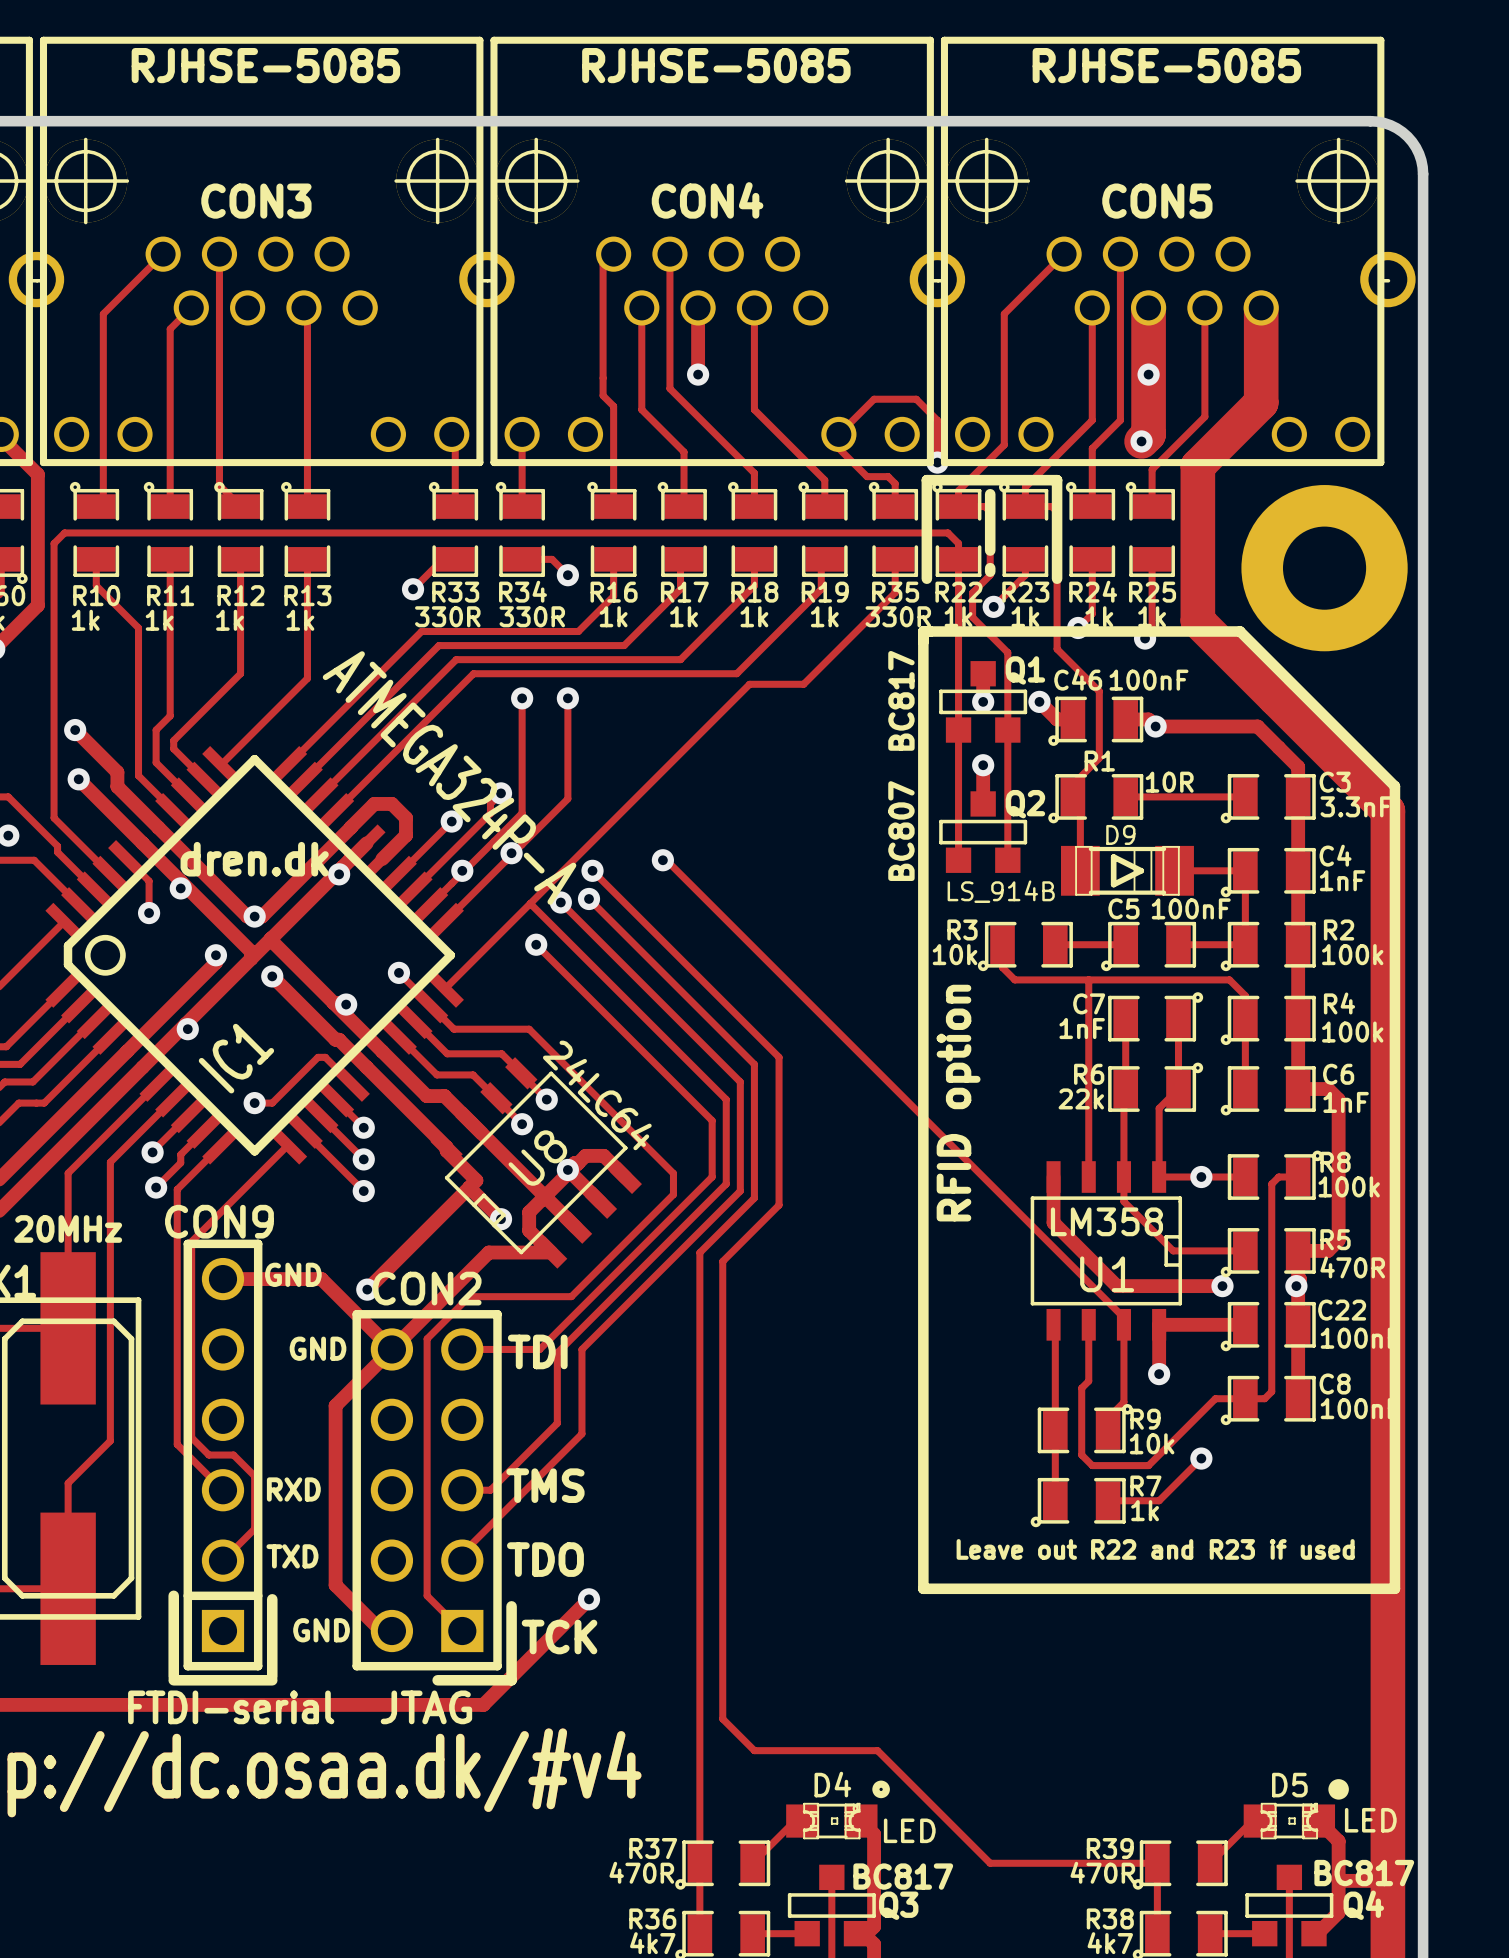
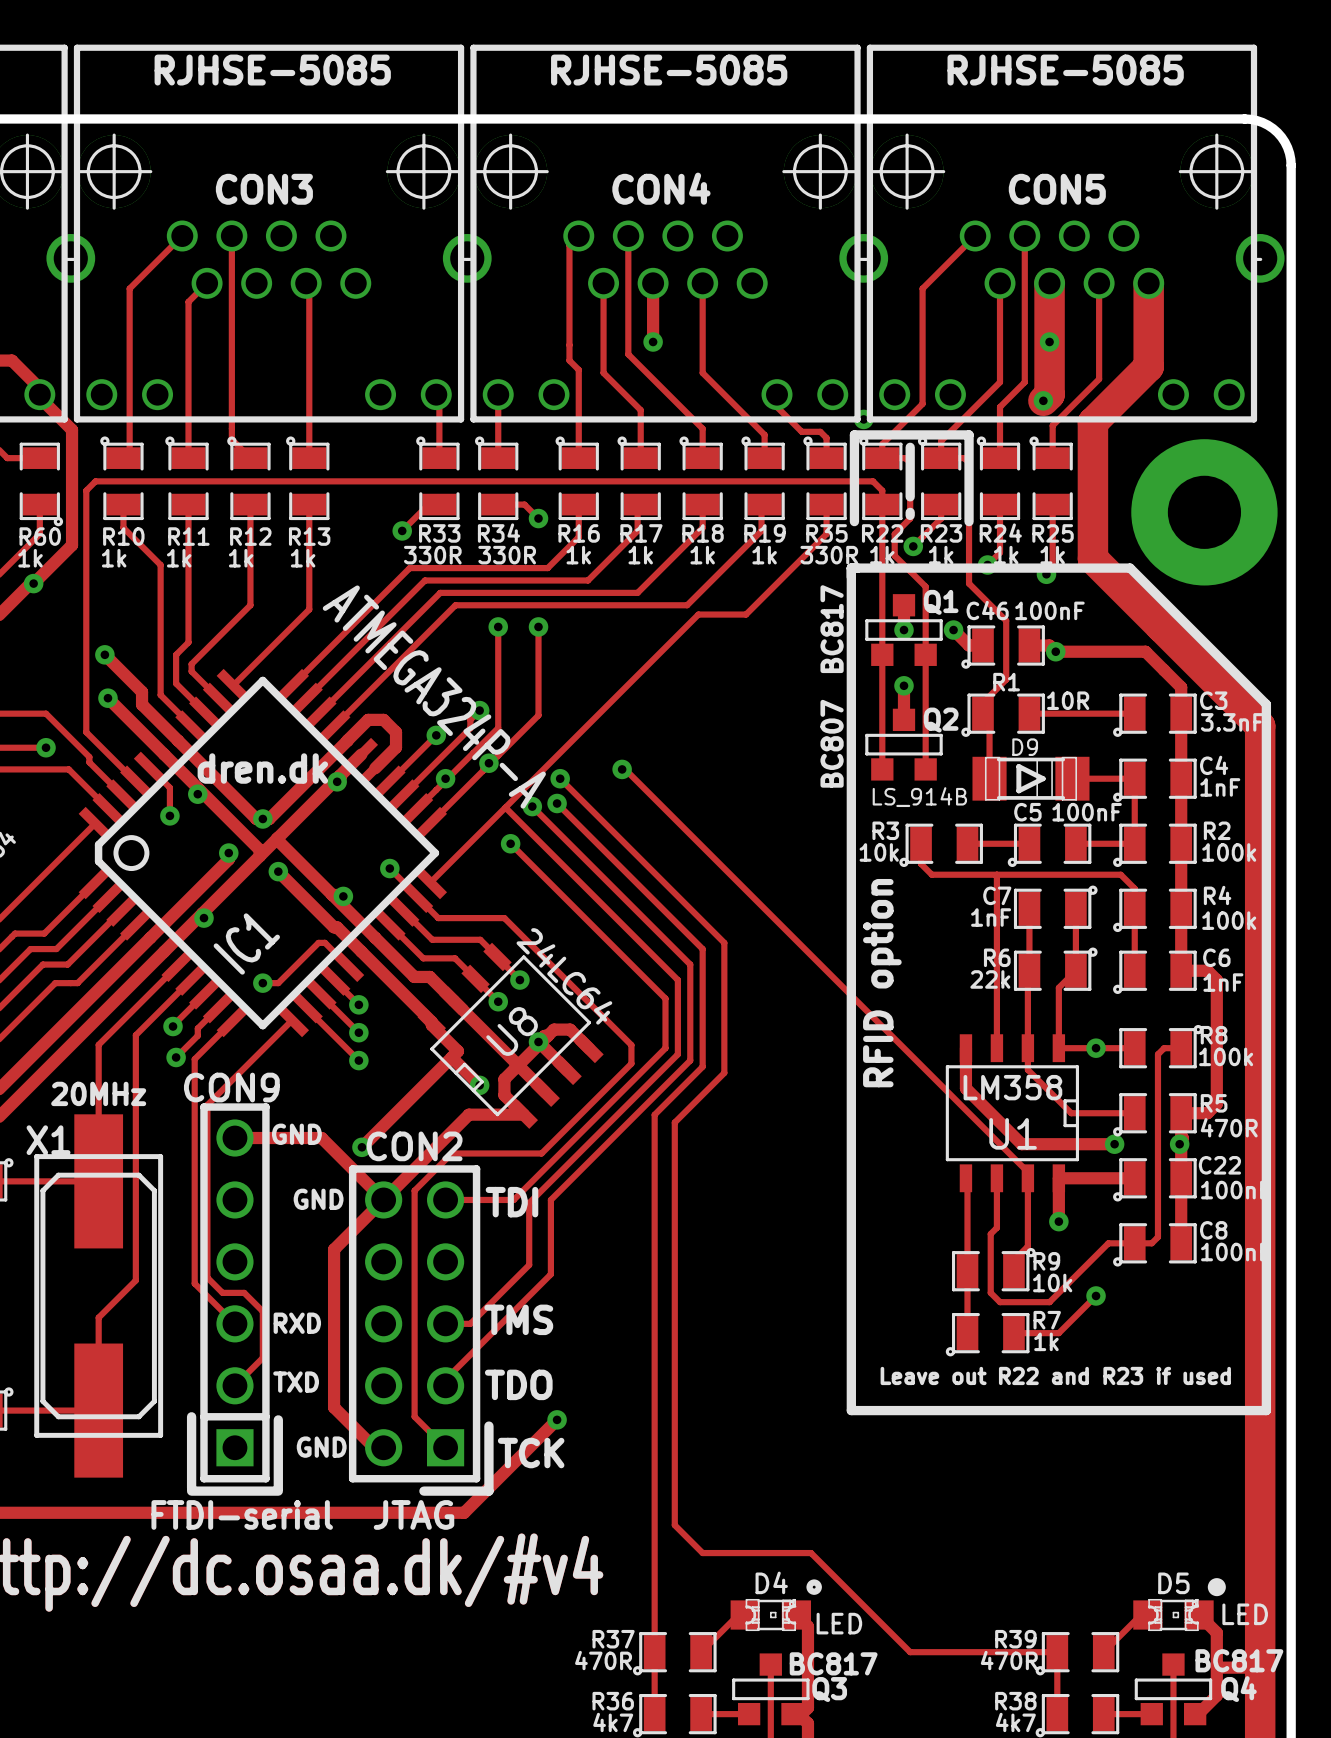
track: (838, 434) (874, 399) (916, 399) (937, 420) (937, 462) -> none

